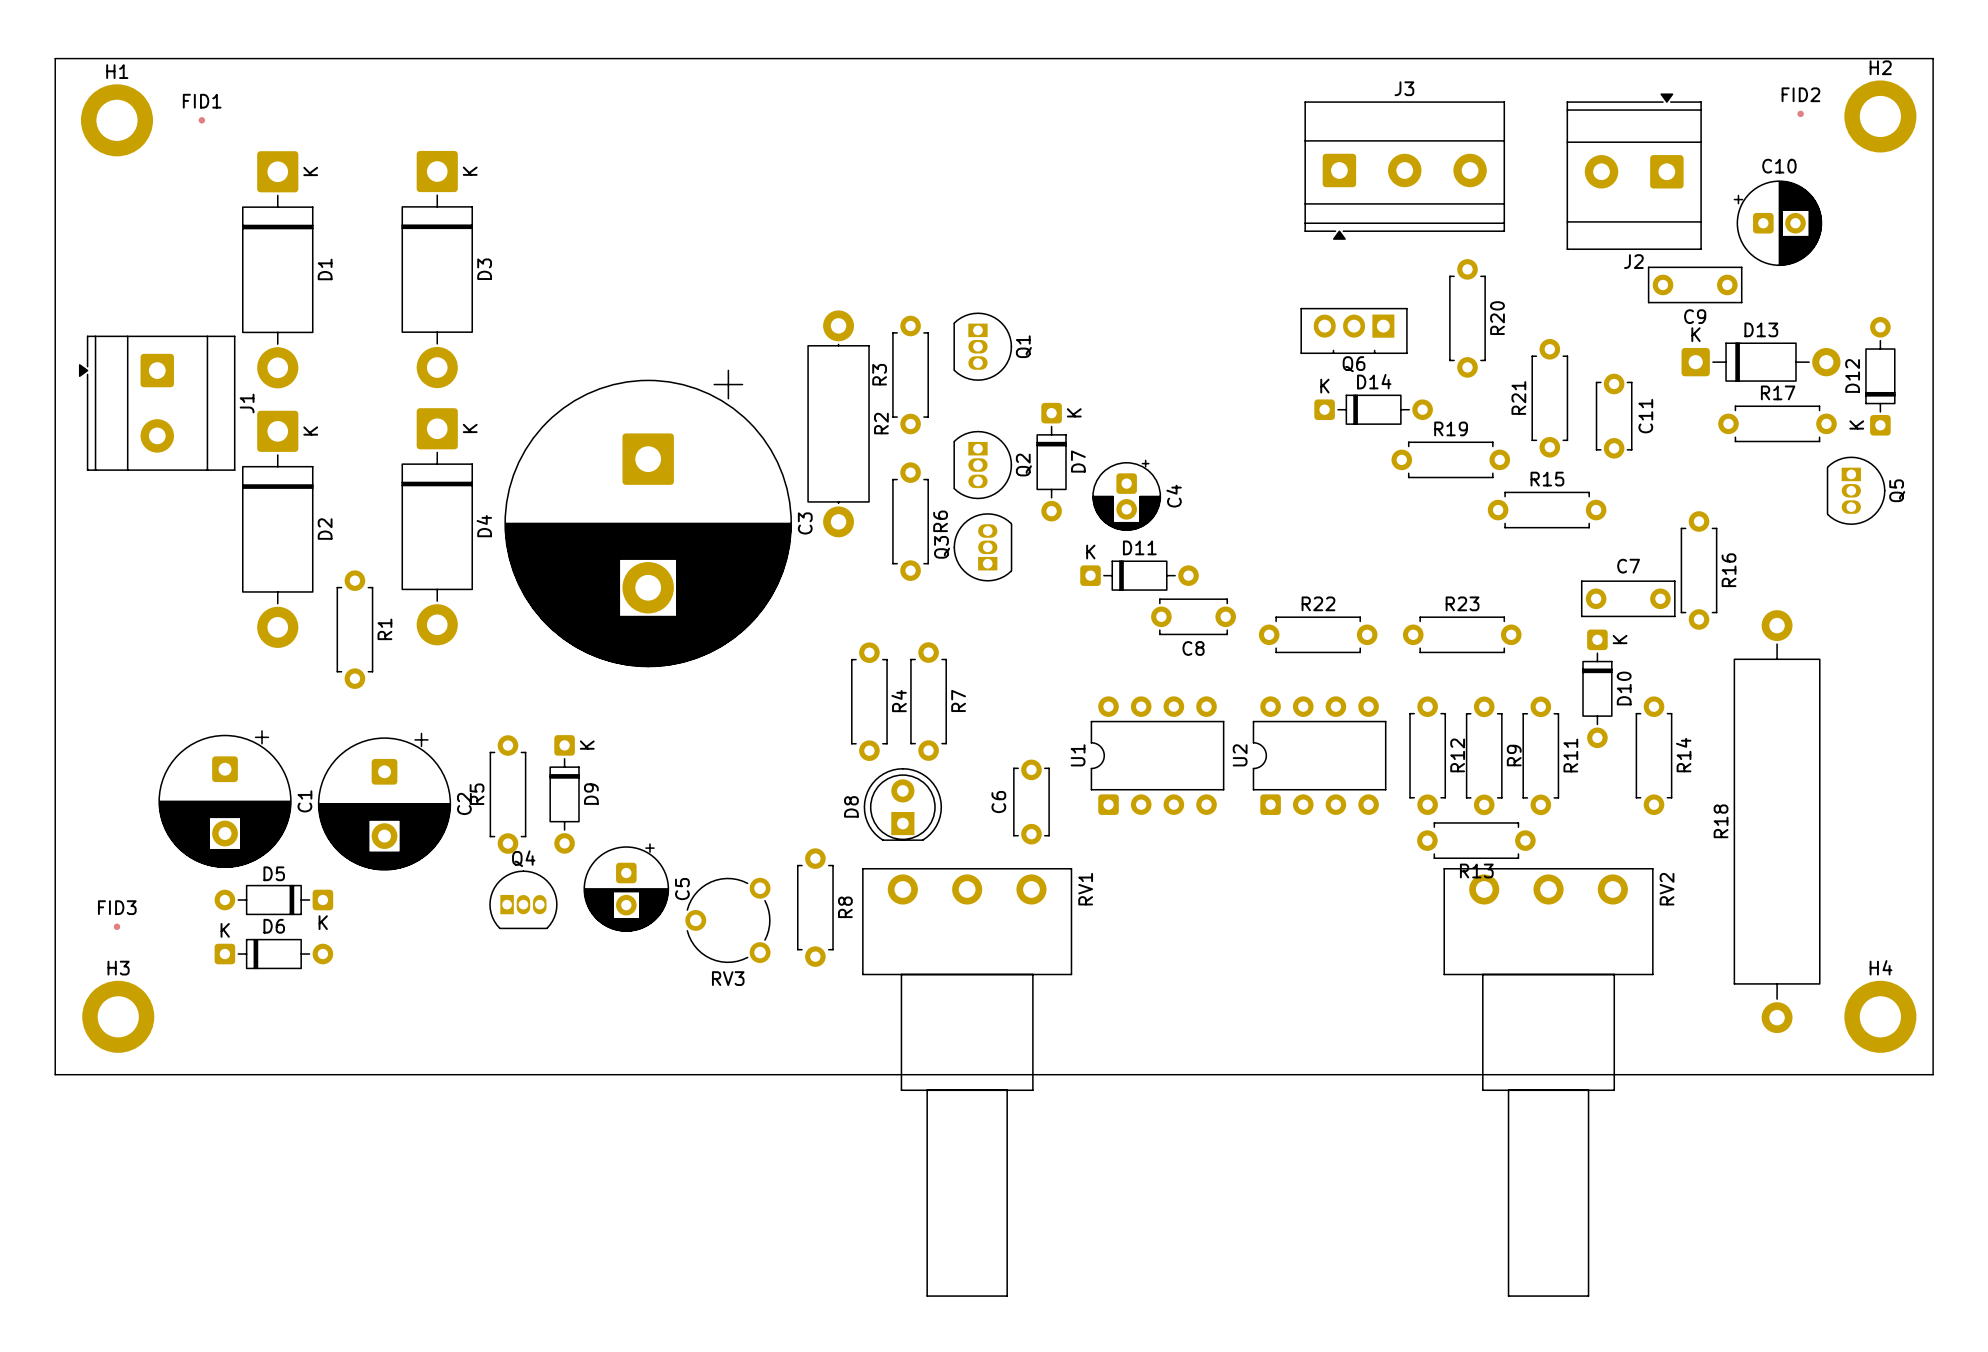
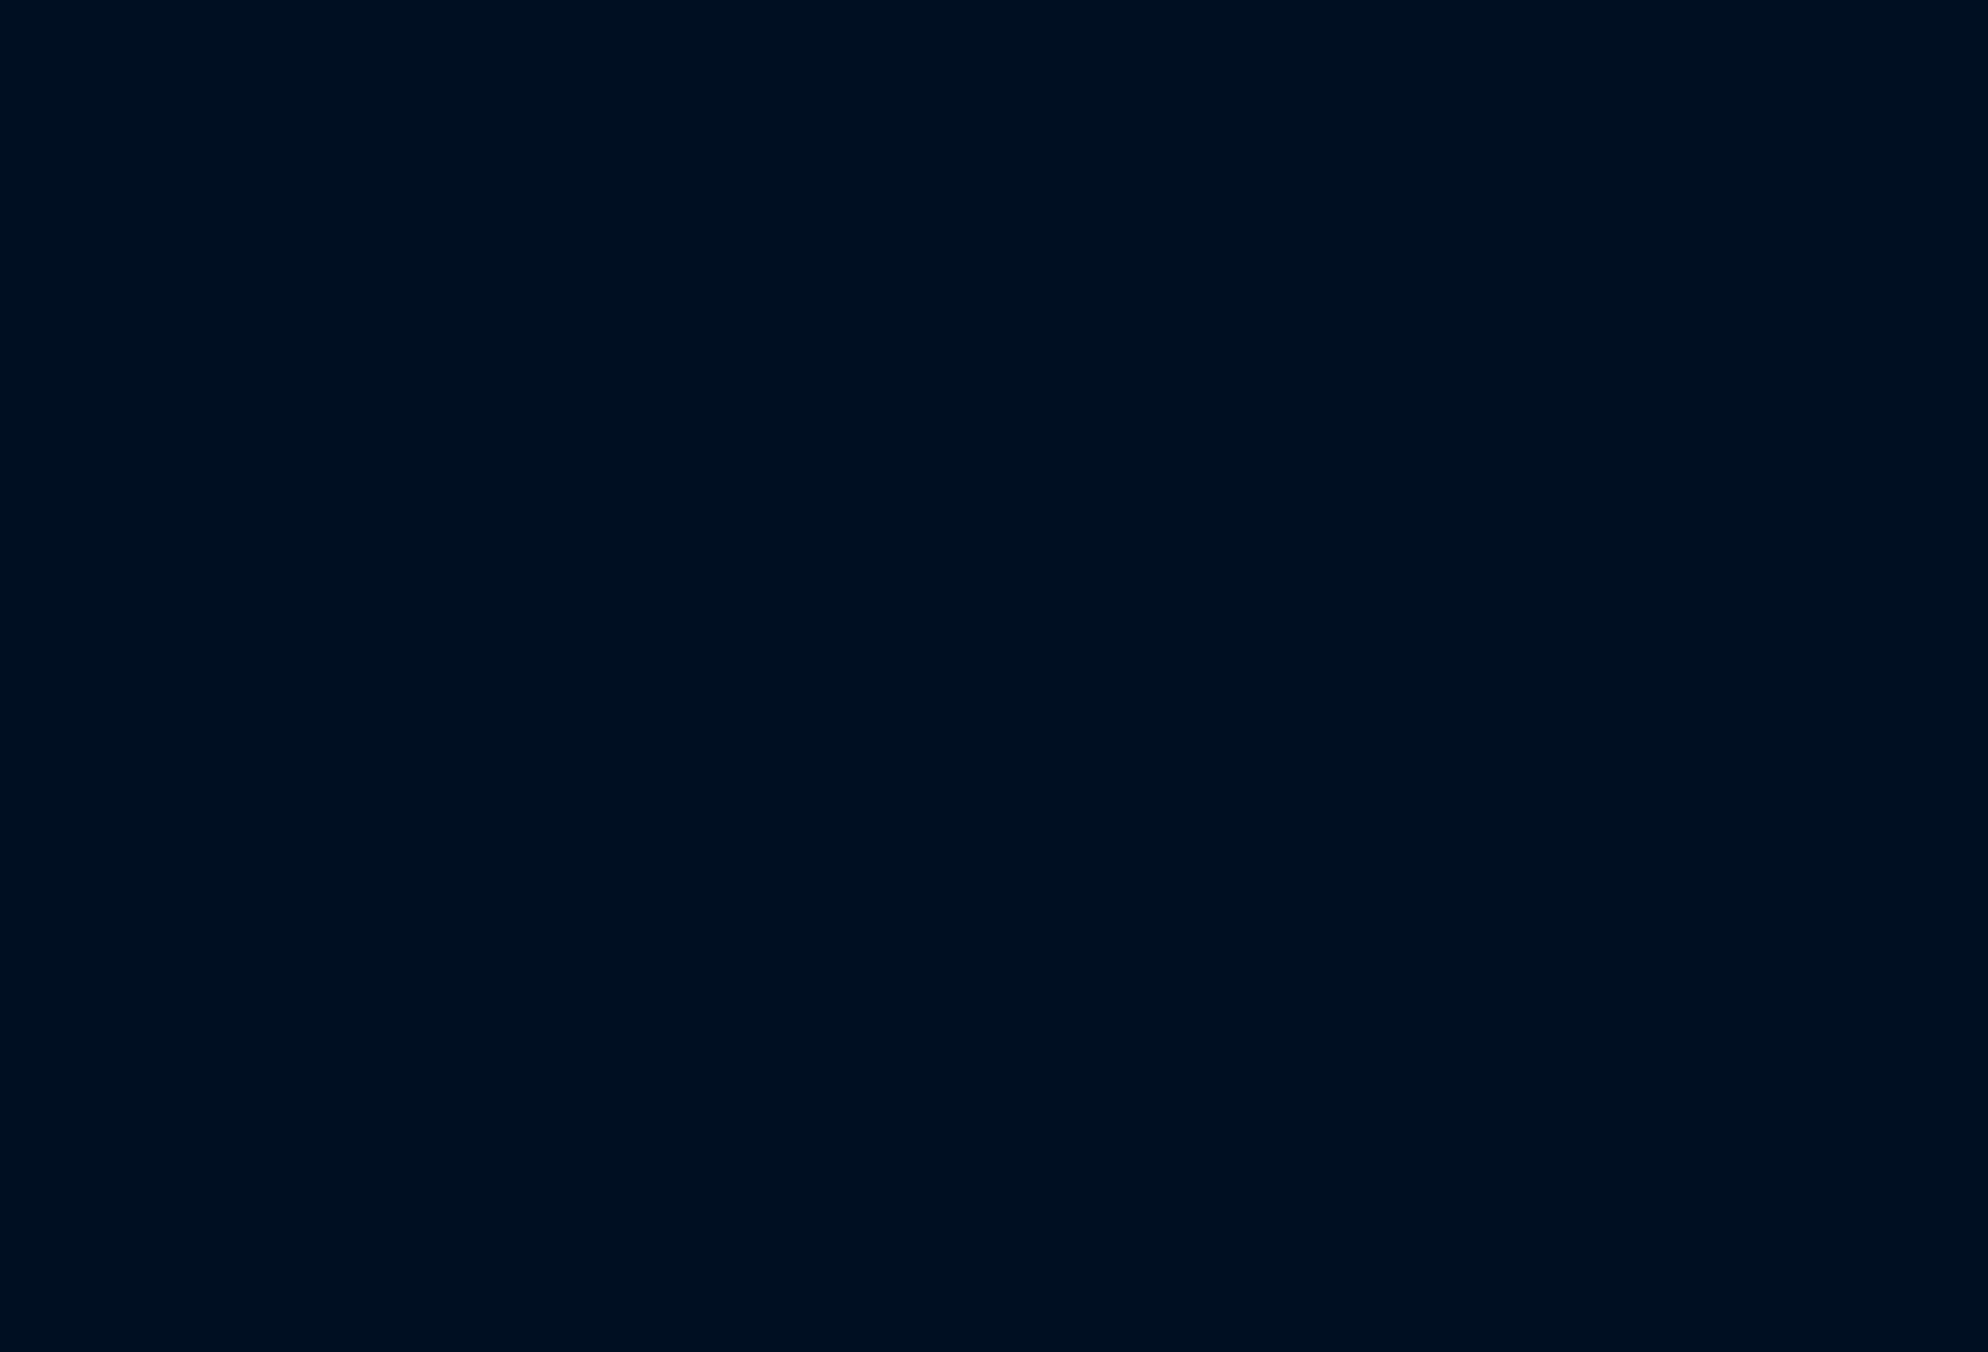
board edge: (55, 58) (1933, 58) (1933, 1074) (55, 1074) (55, 58) -> none
FID2: (1800, 113) -> none
H2: (1880, 116) -> none
H1: (116, 120) -> none
FID1: (201, 120) -> none
J3: (1404, 170) -> none
J2: (1634, 171) -> none
C10: (1777, 223) -> none
D1: (277, 269) -> none
D3: (437, 269) -> none
C9: (1695, 284) -> none
R20: (1467, 318) -> none
Q6: (1354, 330) -> none
Q1: (982, 346) -> none
D13: (1761, 362) -> none
R3: (910, 374) -> none
D12: (1880, 376) -> none
R21: (1549, 398) -> none
J1: (157, 403) -> none
D14: (1373, 409) -> none
C11: (1614, 416) -> none
R2: (838, 423) -> none
R17: (1777, 423) -> none
R19: (1450, 459) -> none
D7: (1051, 462) -> none
Q2: (982, 465) -> none
Q5: (1856, 490) -> none
C4: (1126, 495) -> none
R15: (1547, 510) -> none
C3: (648, 518) -> none
R6: (910, 521) -> none
D4: (437, 526) -> none
D2: (277, 529) -> none
Q3: (982, 547) -> none
R16: (1699, 570) -> none
D11: (1139, 575) -> none
C7: (1628, 598) -> none
C8: (1193, 616) -> none
R1: (354, 629) -> none
R22: (1318, 634) -> none
R23: (1462, 634) -> none
D10: (1597, 688) -> none
R4: (869, 701) -> none
R7: (928, 701) -> none
U1: (1157, 755) -> none
U2: (1319, 755) -> none
R12: (1427, 755) -> none
R9: (1484, 755) -> none
R11: (1540, 755) -> none
R14: (1654, 755) -> none
R5: (507, 794) -> none
D9: (564, 794) -> none
C1: (225, 799) -> none
C2: (384, 801) -> none
C6: (1031, 802) -> none
D8: (902, 804) -> none
R18: (1777, 821) -> none
R13: (1476, 840) -> none
C5: (626, 887) -> none
D5: (273, 899) -> none
Q4: (523, 899) -> none
R8: (815, 907) -> none
RV3: (727, 920) -> none
FID3: (116, 926) -> none
D6: (273, 954) -> none
H3: (118, 1016) -> none
H4: (1880, 1016) -> none
RV1: (967, 1082) -> none
RV2: (1548, 1082) -> none

